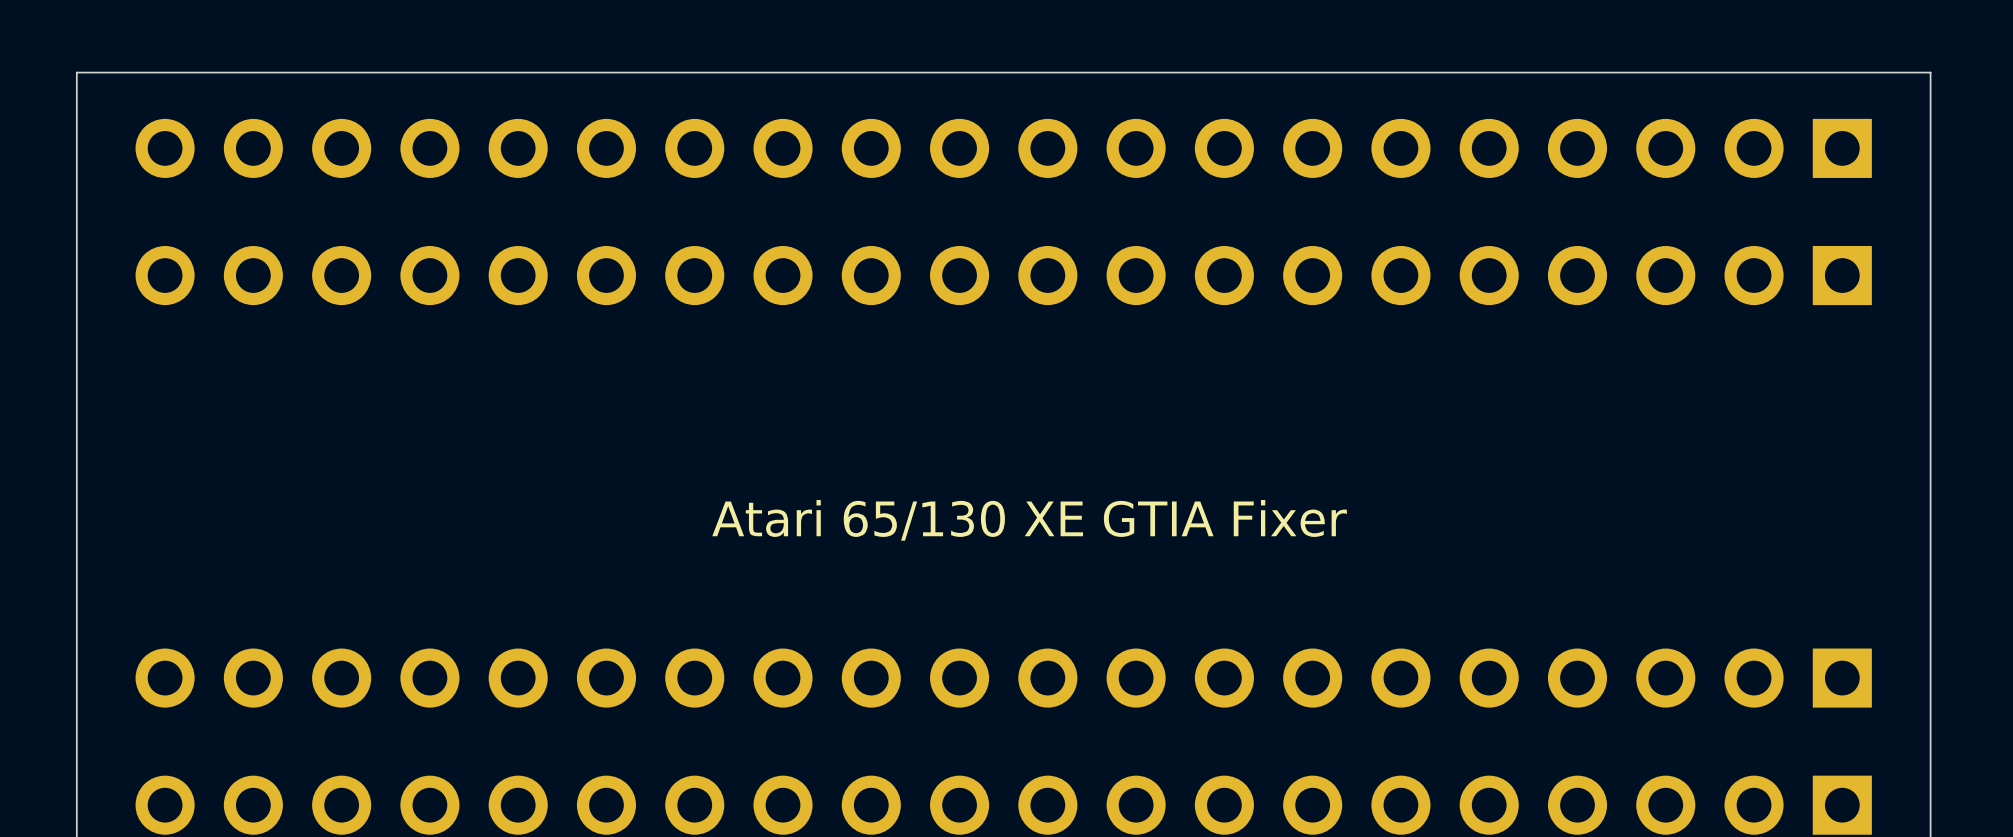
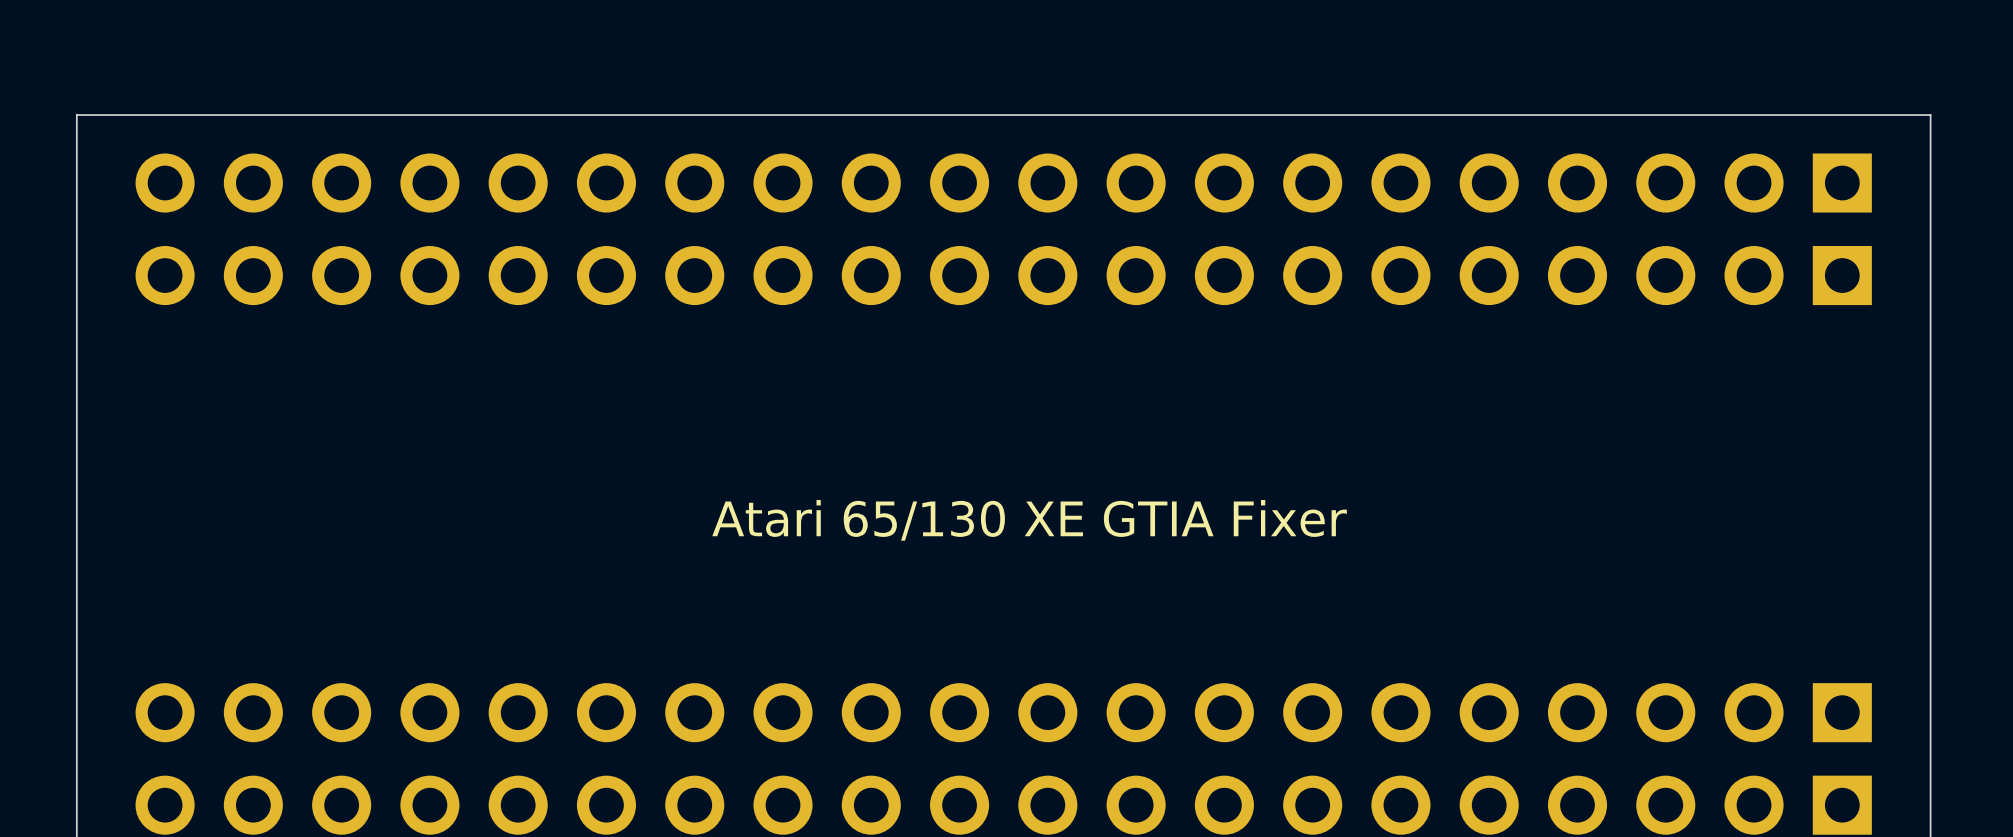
board edge: (1930, 115) (1930, 72) (76, 72) (76, 115) -> (1930, 115) (76, 115)
part position: (1003, 148) -> (1003, 183)
part position: (1003, 678) -> (1003, 712)

